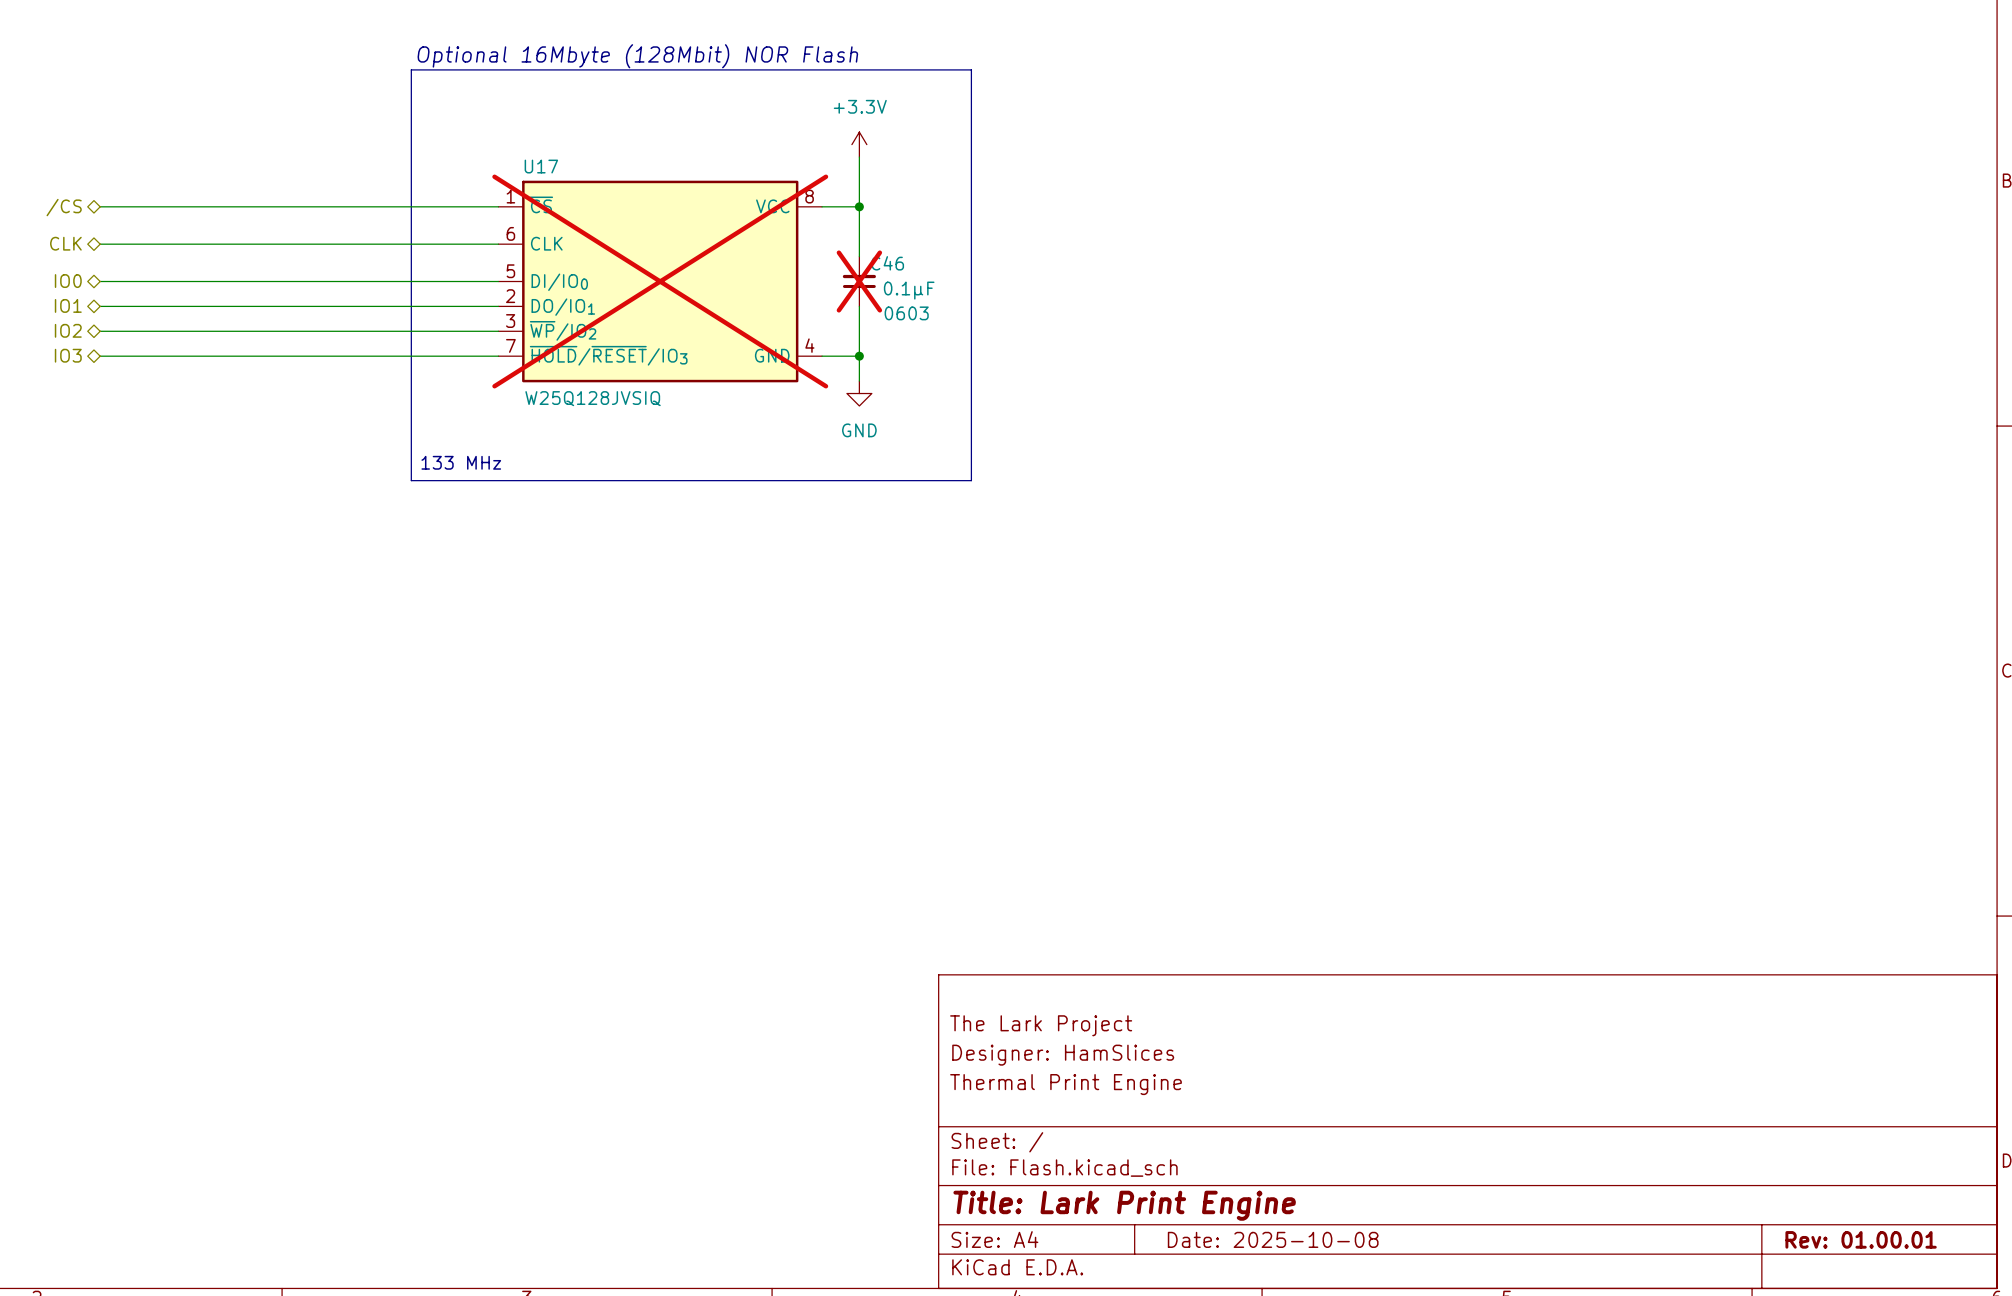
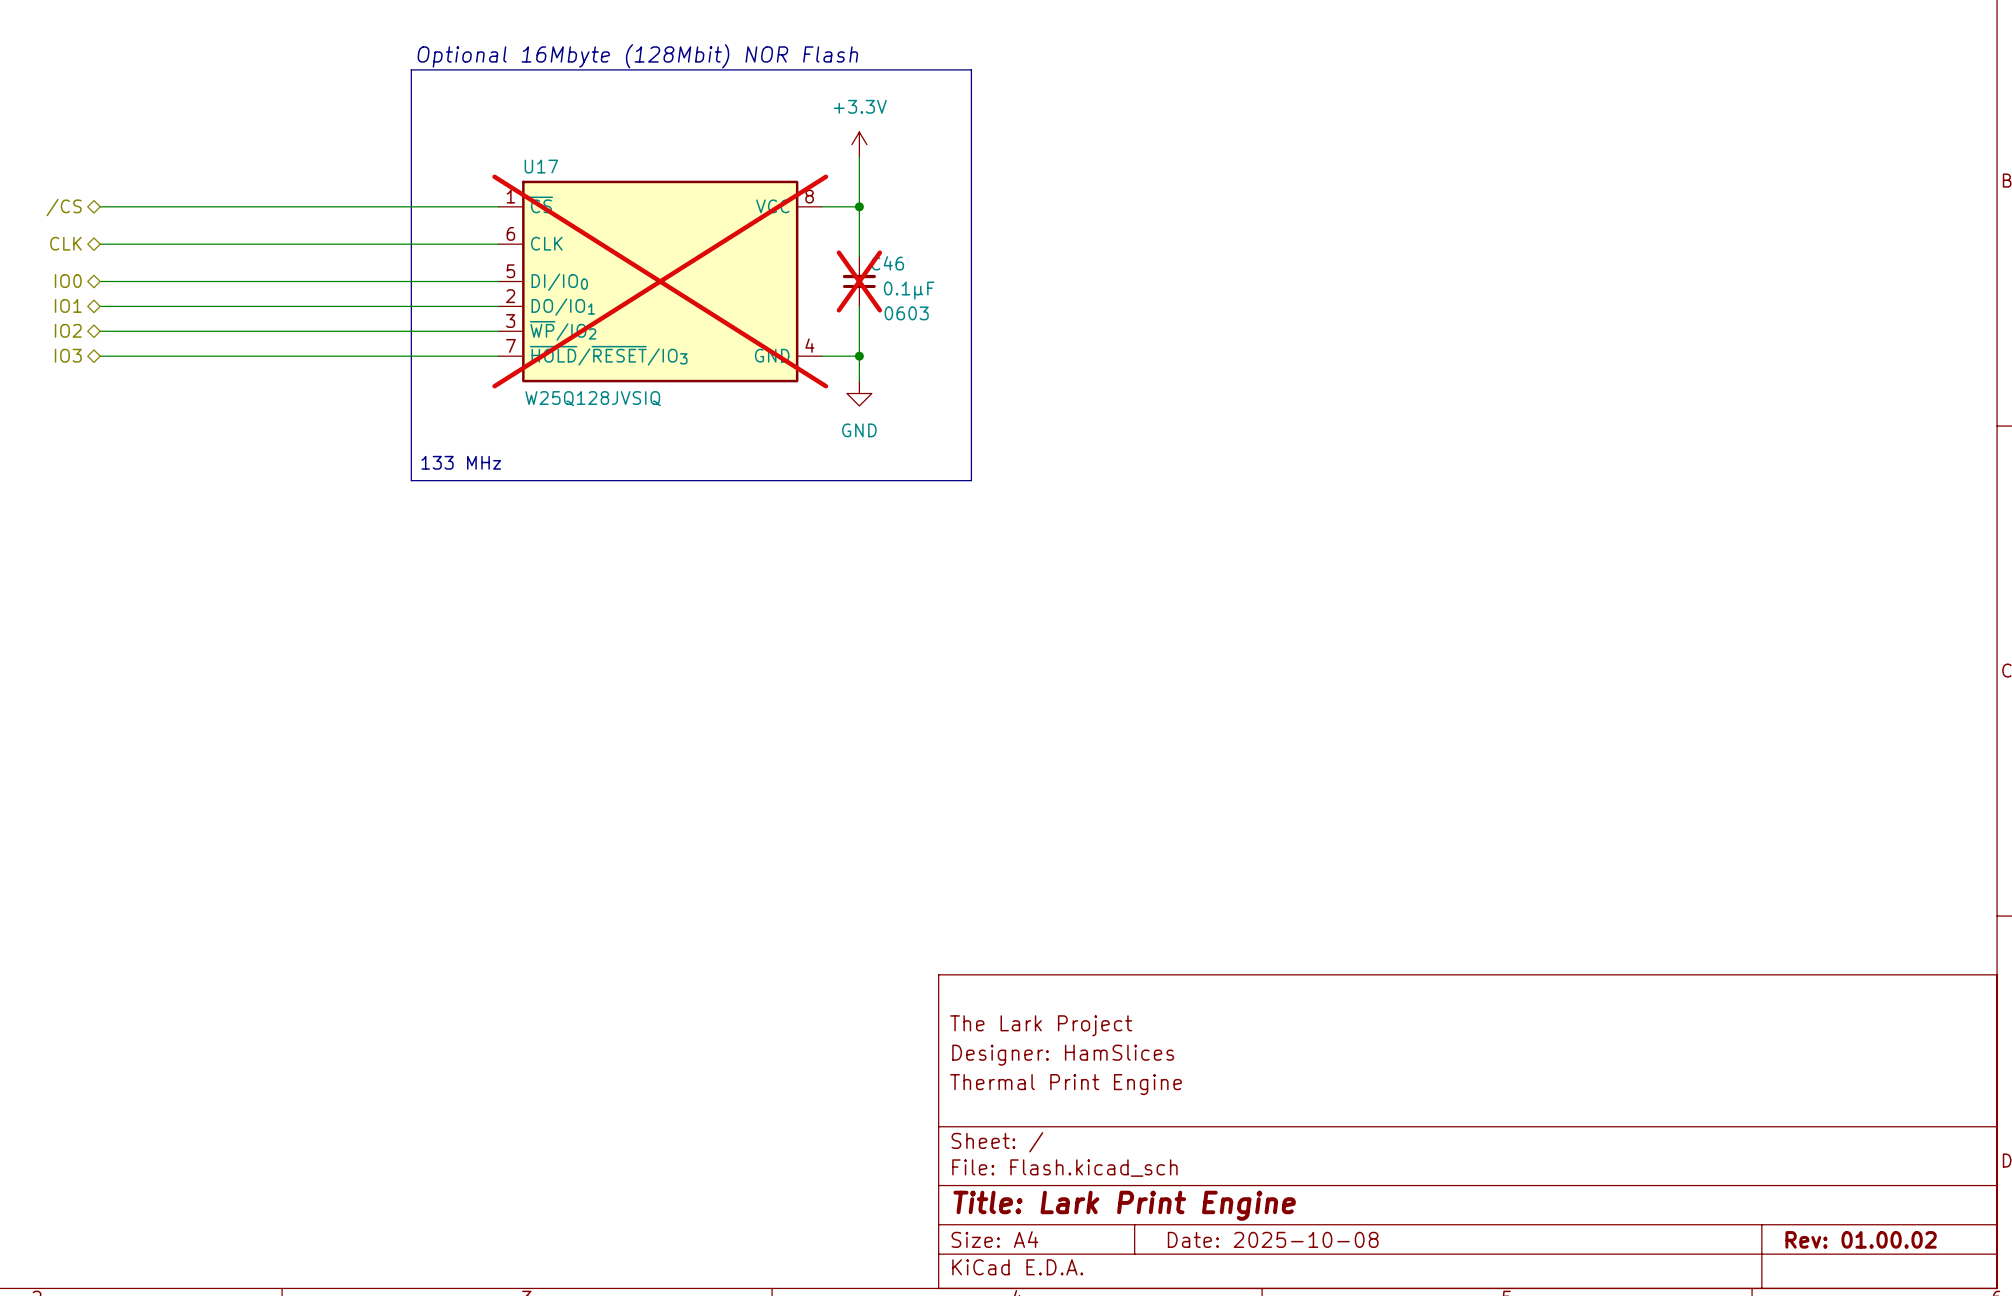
title block: Rev: 01.00.01 (1861, 1239) -> Rev: 01.00.02 (1861, 1239)

